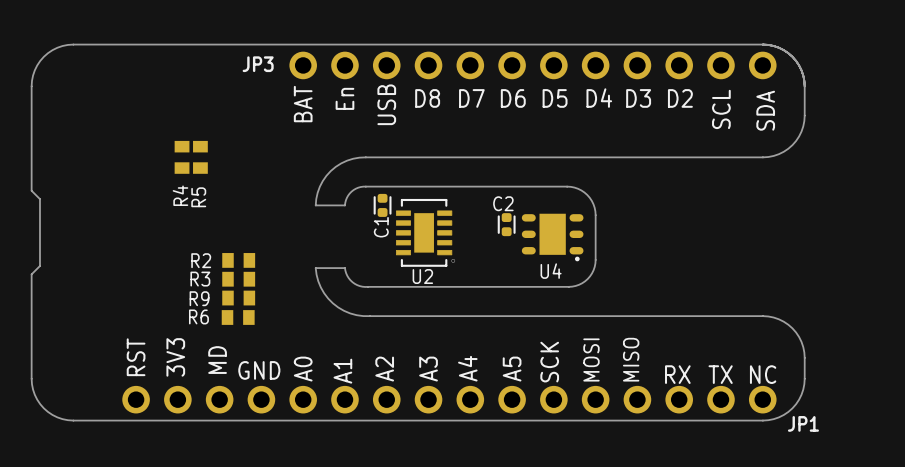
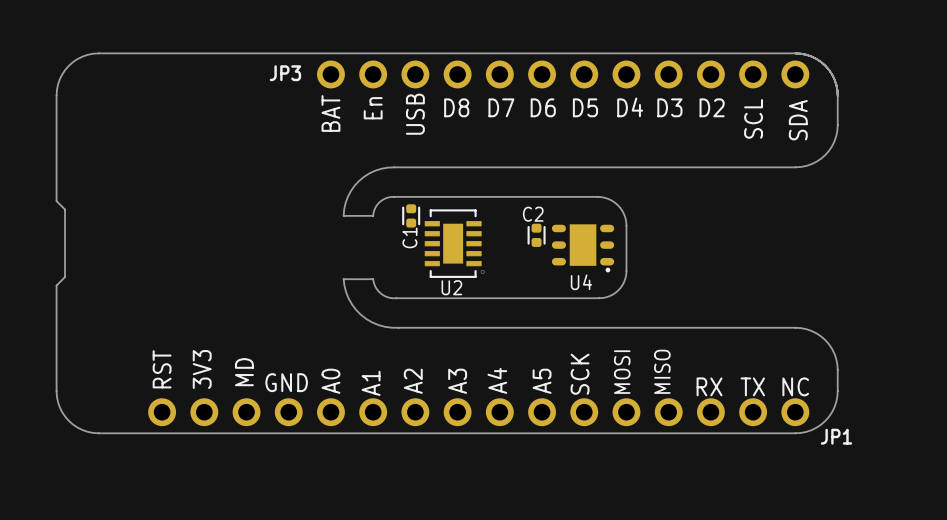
R4: (182, 157) -> none
R5: (200, 157) -> none
R2: (238, 260) -> none
R3: (238, 279) -> none
R6: (238, 298) -> none
R9: (238, 317) -> none

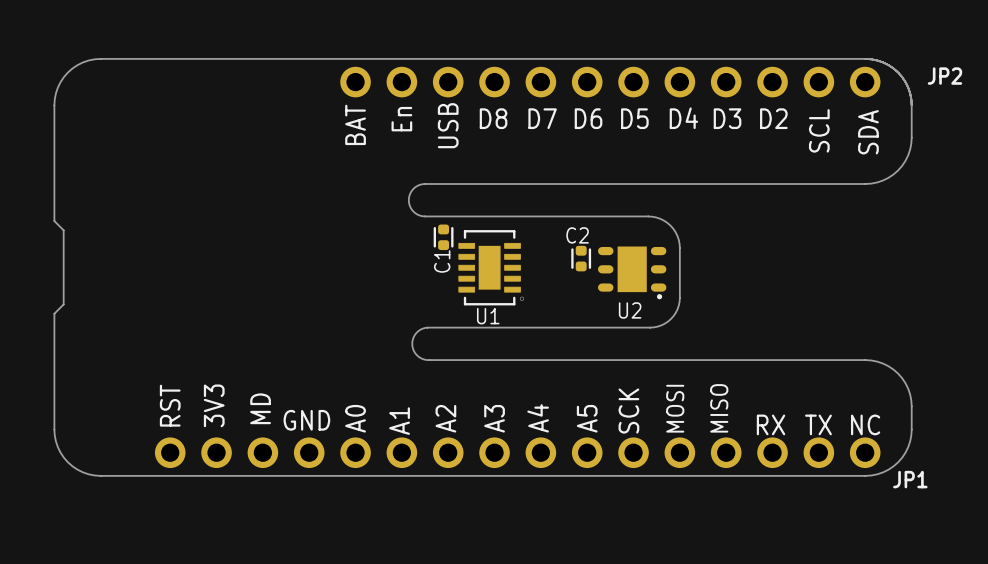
JP3 name: JP3 (285, 73) -> JP2 (944, 76)
board edge: (394, 167) (375, 170) (358, 181) (347, 196) (343, 215) (373, 215) (375, 208) (379, 202) (386, 198) (394, 196) -> (425, 184) (413, 188) (408, 200) (413, 211) (425, 216)
U4 name: U4 (581, 282) -> U2 (630, 310)
U2 name: U2 (451, 287) -> U1 (488, 316)
board edge: (396, 298) (388, 297) (380, 293) (375, 287) (373, 279) (343, 279) (348, 298) (361, 314) (378, 325) (398, 327) -> (427, 327) (416, 333) (412, 345) (417, 356) (429, 360)

